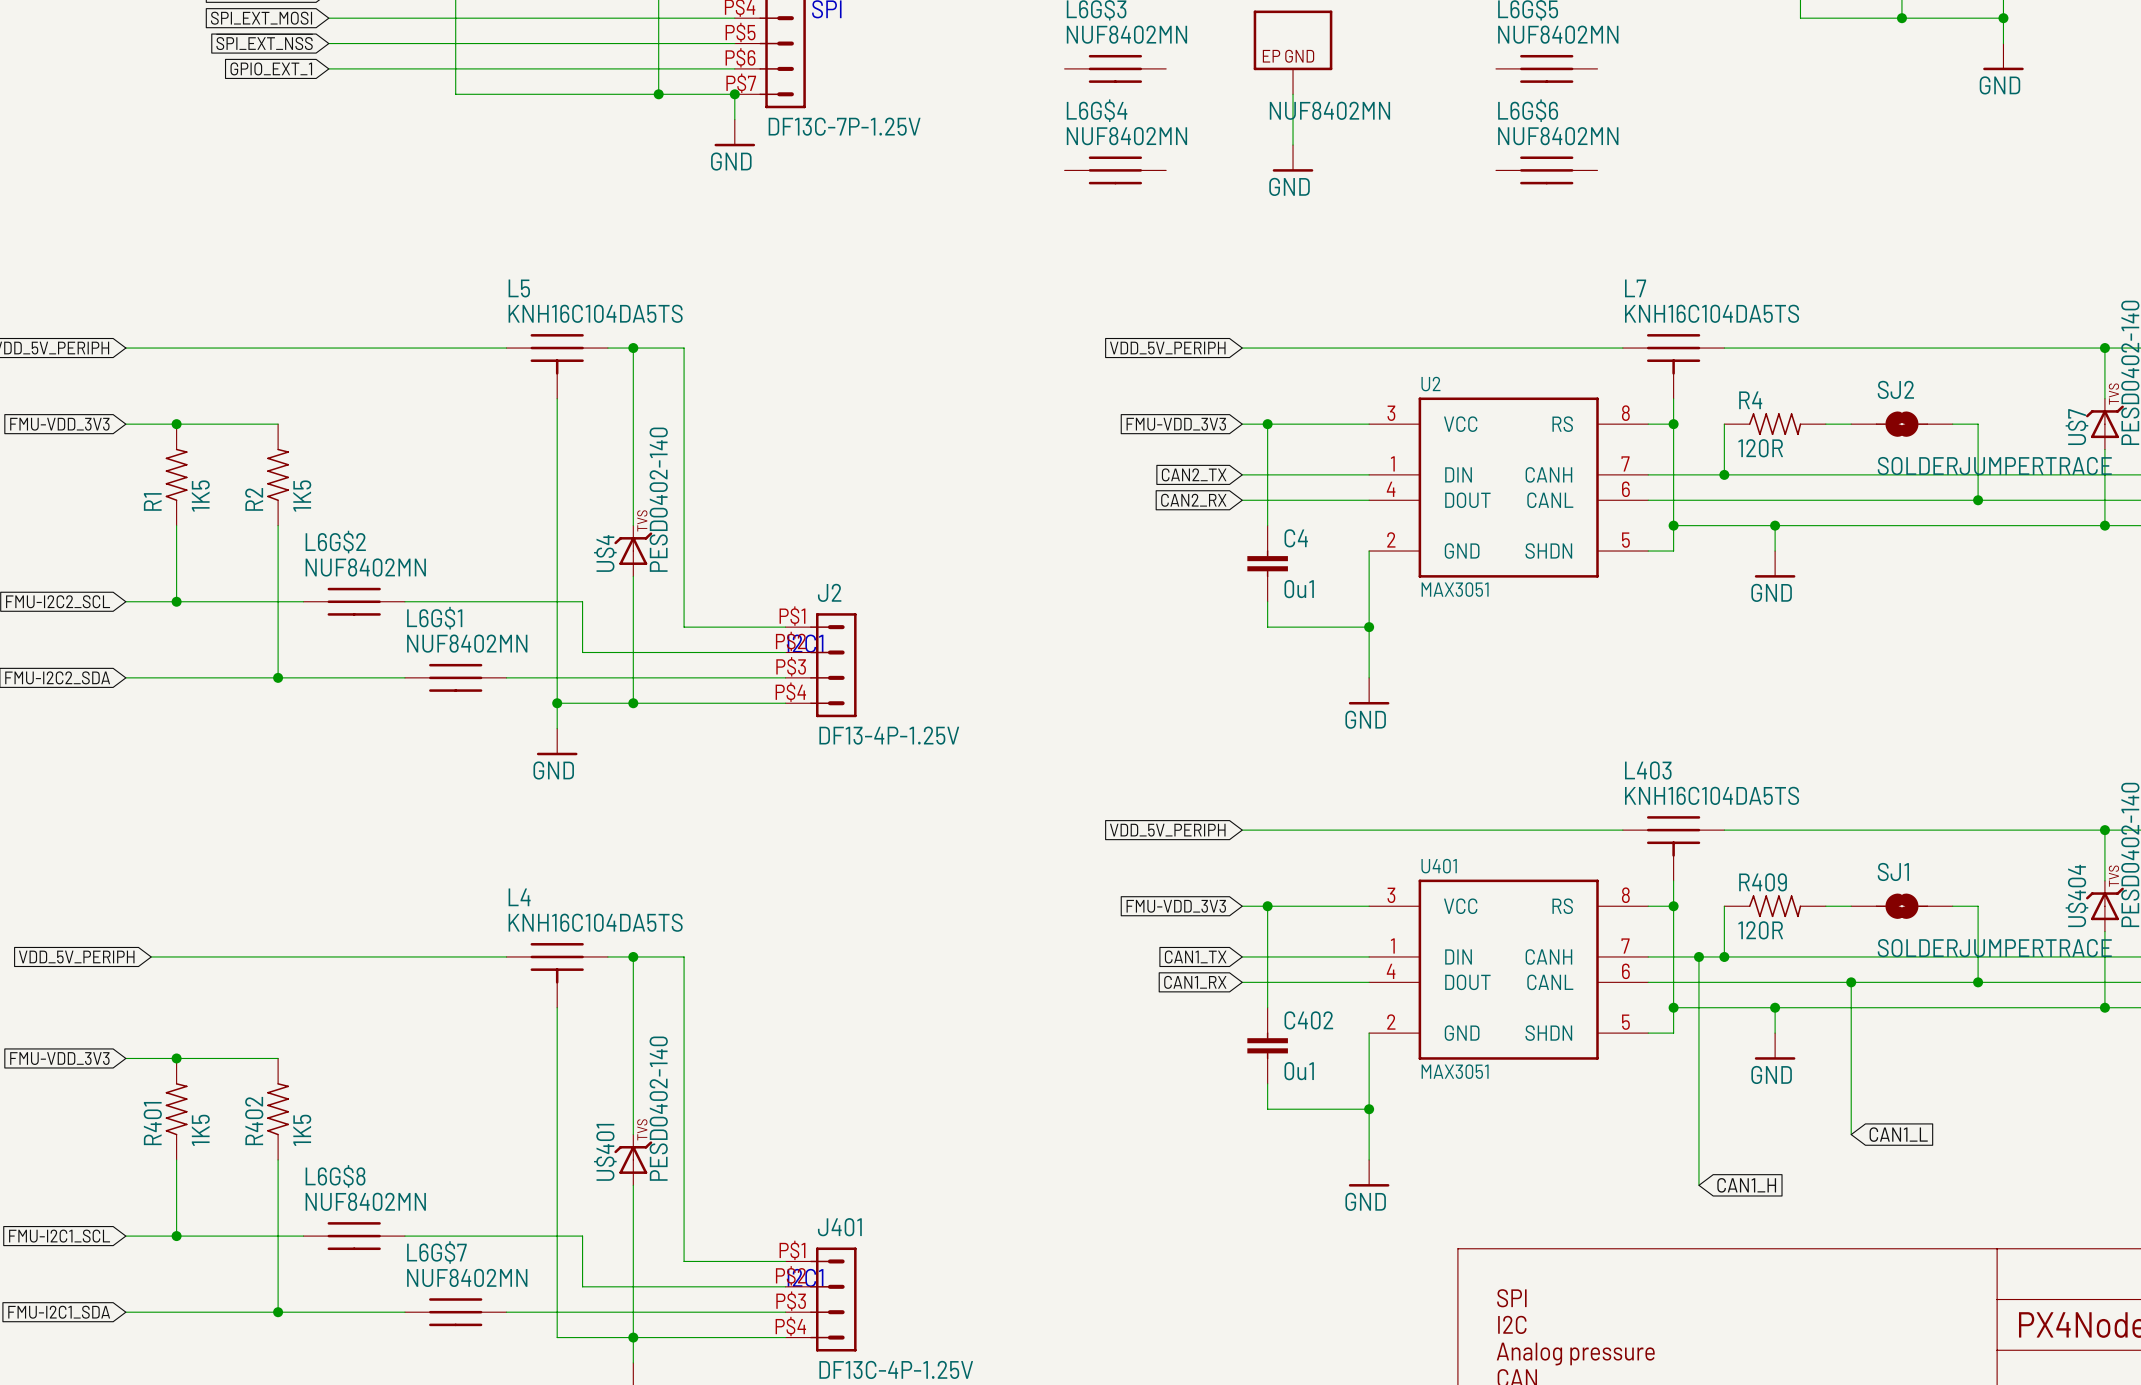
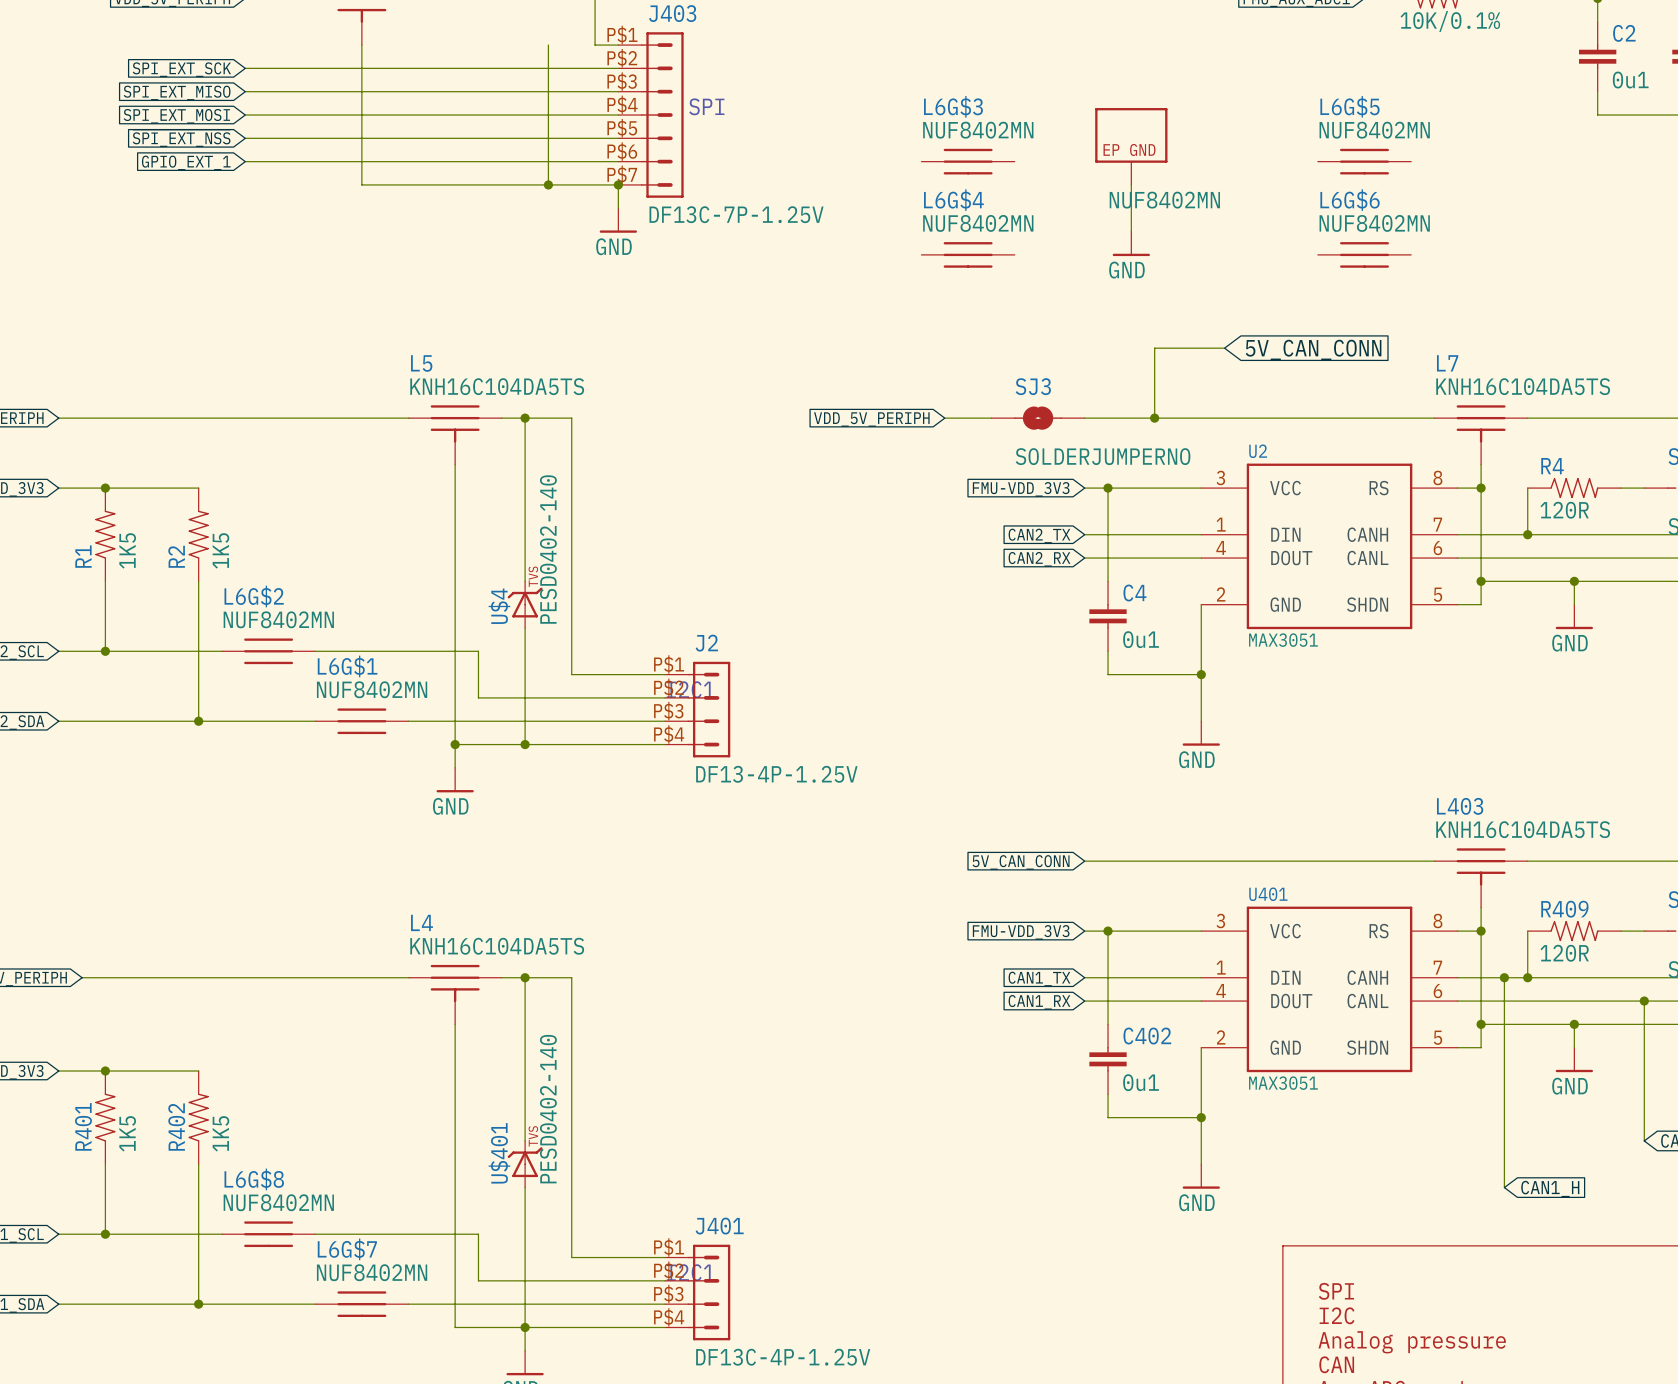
wire: none -> (1224, 348) (1154, 348) (1154, 418)
global label: none -> 5V_CAN_CONN (1313, 350)
wire: none -> (944, 418) (991, 418)
global label position: VDD_5V_PERIPH (1167, 348) -> VDD_5V_PERIPH (871, 419)
SJ3: none -> SOLDERJUMPERNO (1038, 418)
junction: none -> (1154, 418)
global label: VDD_5V_PERIPH (1167, 830) -> 5V_CAN_CONN (1021, 862)

